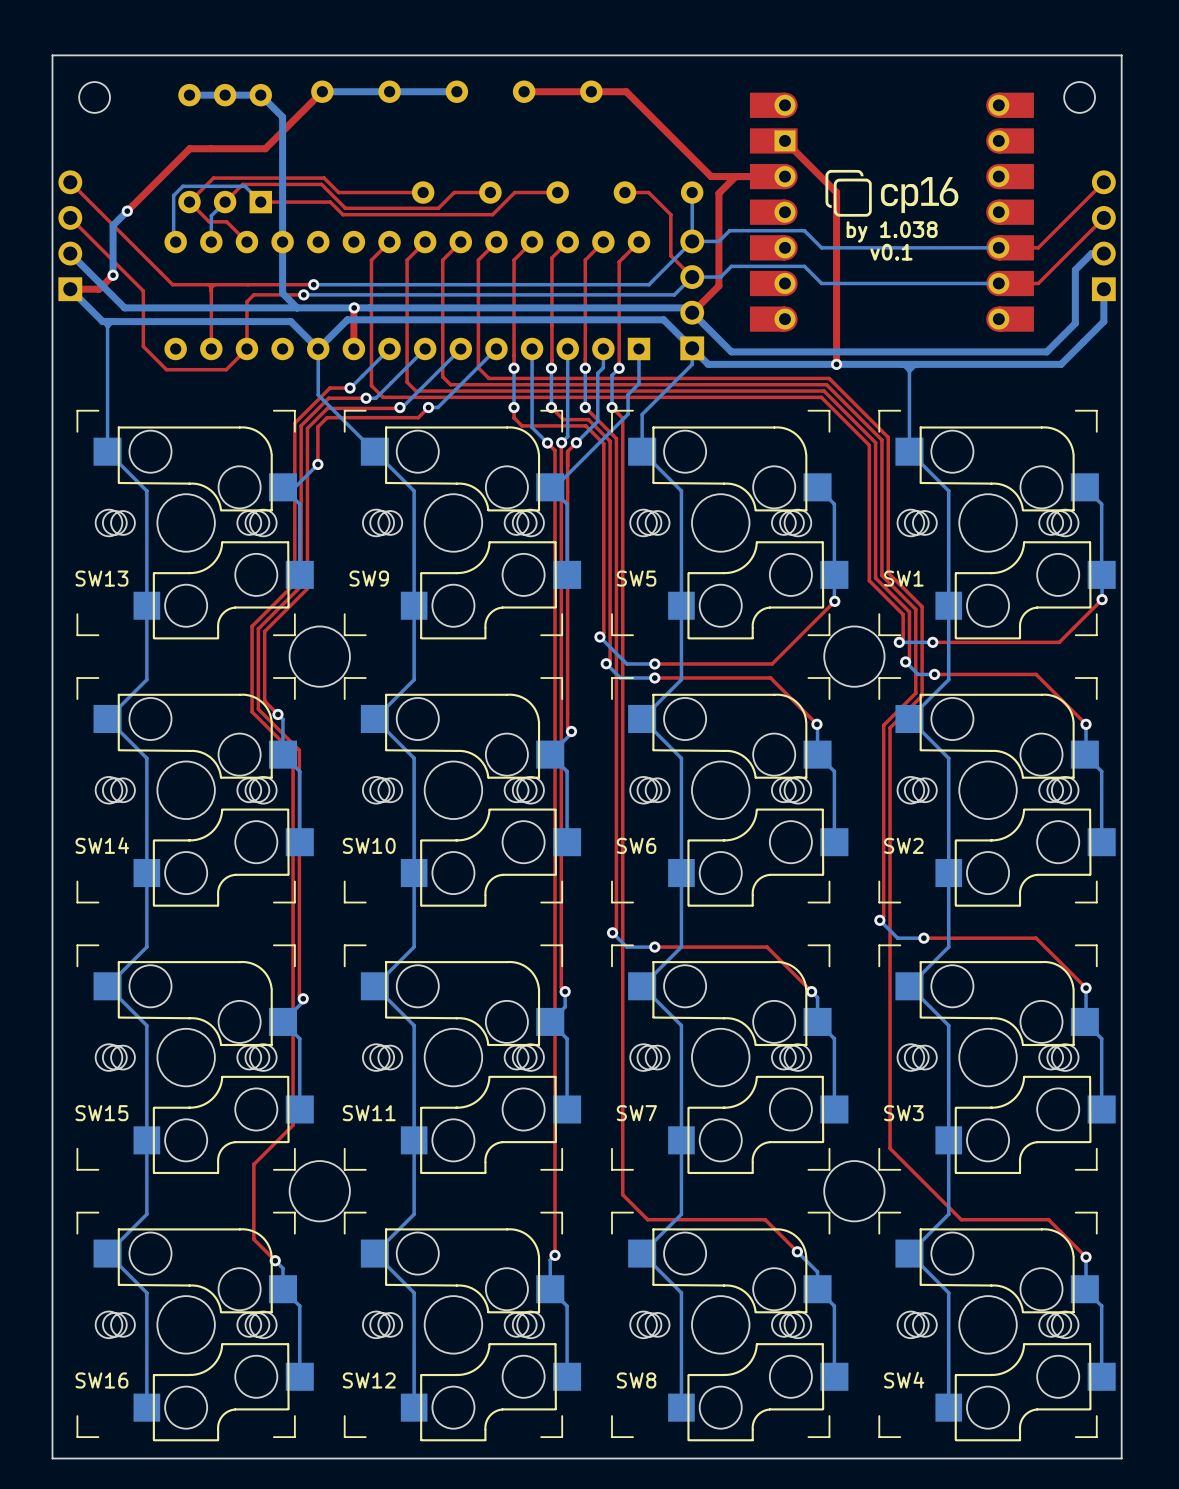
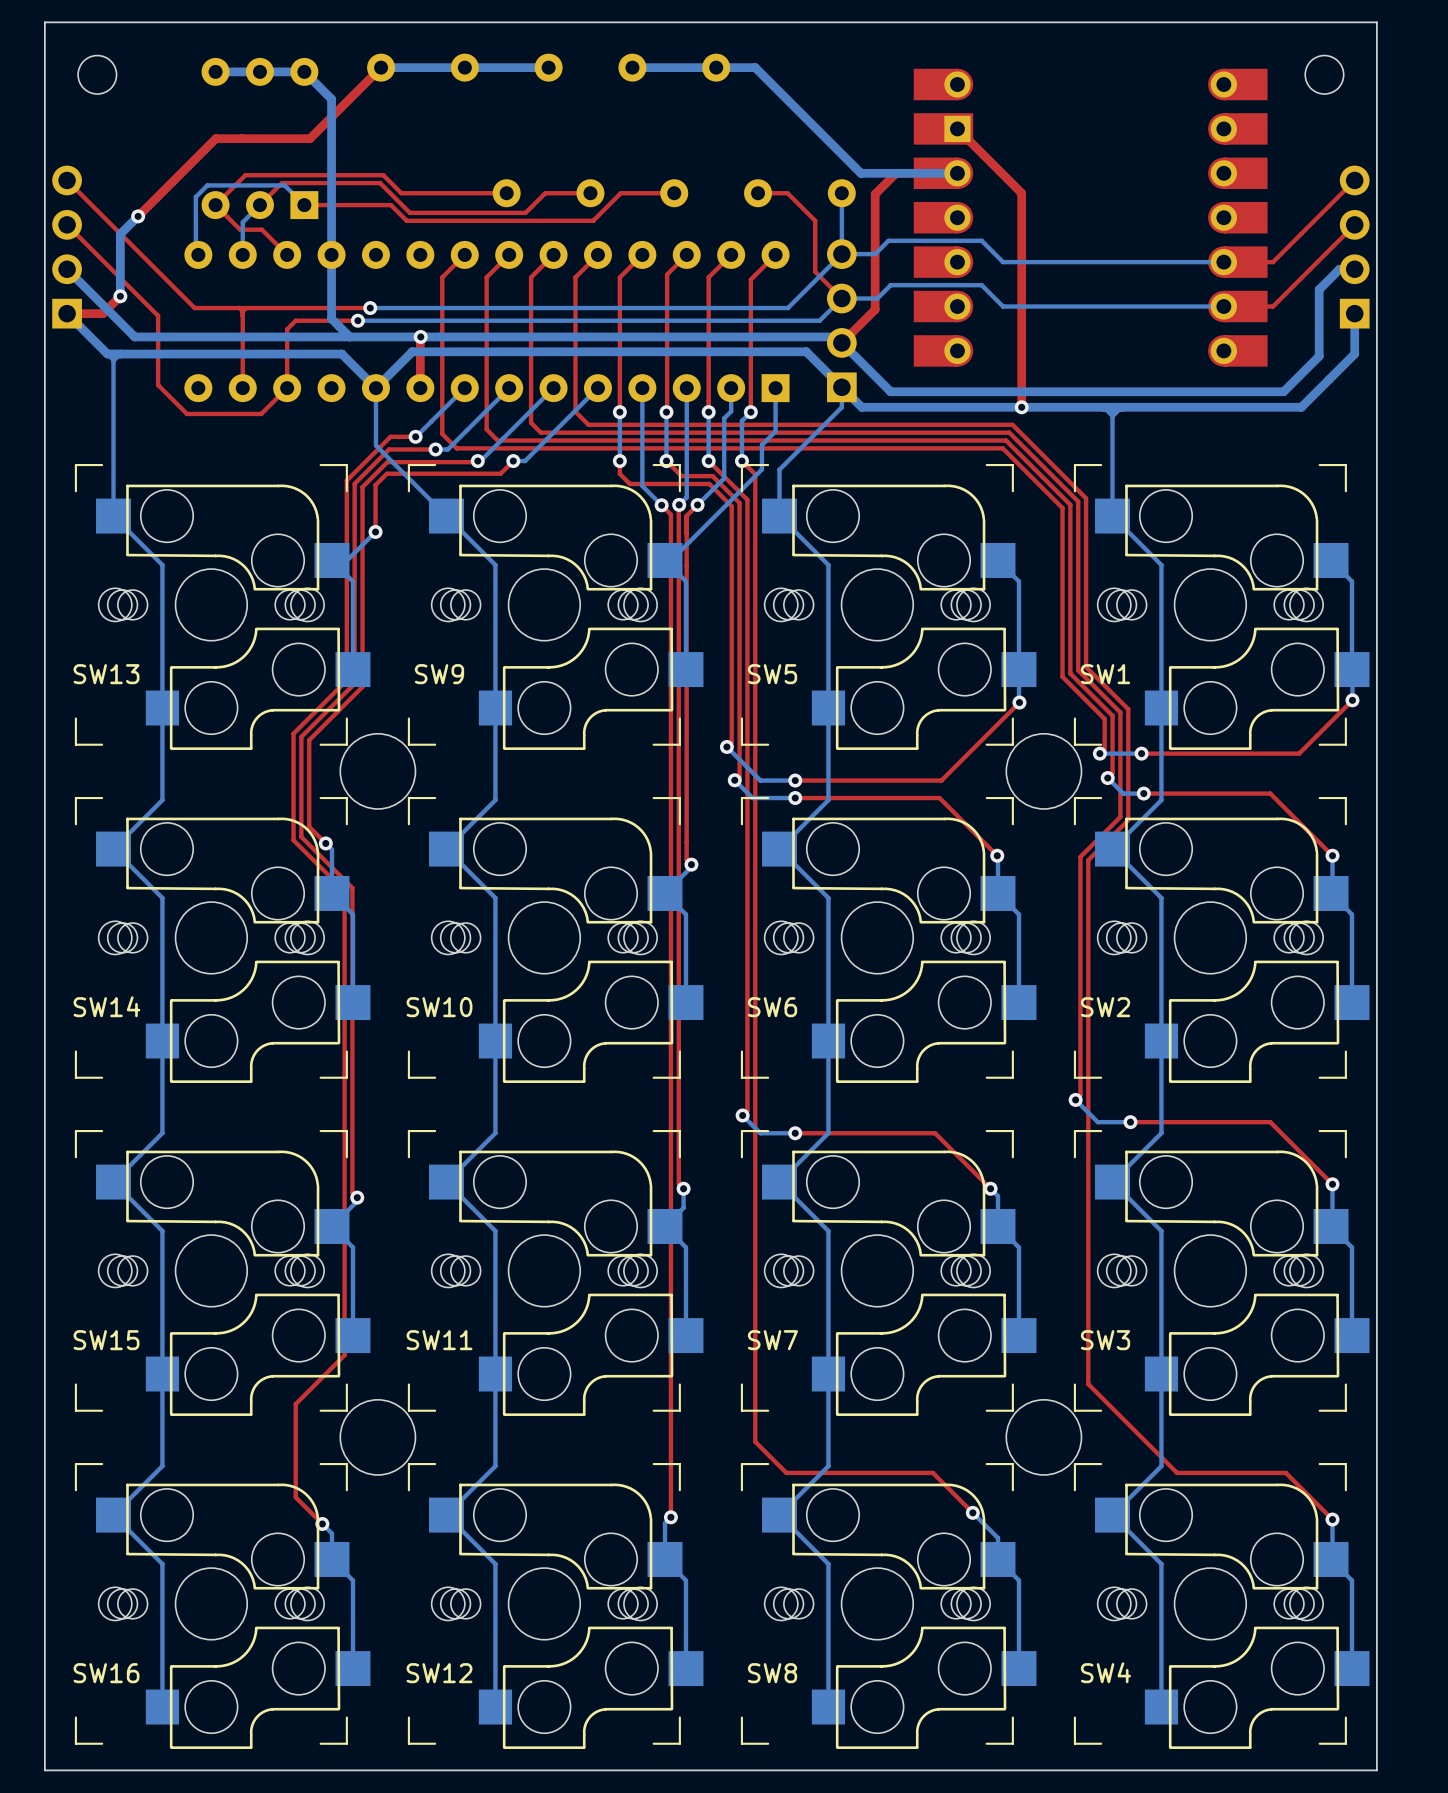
top track: (524, 91) (626, 91) (711, 176) (735, 176) -> none
bottom track: none -> (632, 67) (755, 67) (860, 173) (957, 173)
drawing: [825, 169, 959, 217] -> none
text: by 1.038 (892, 231) -> none
text: v0.1 (891, 252) -> none

